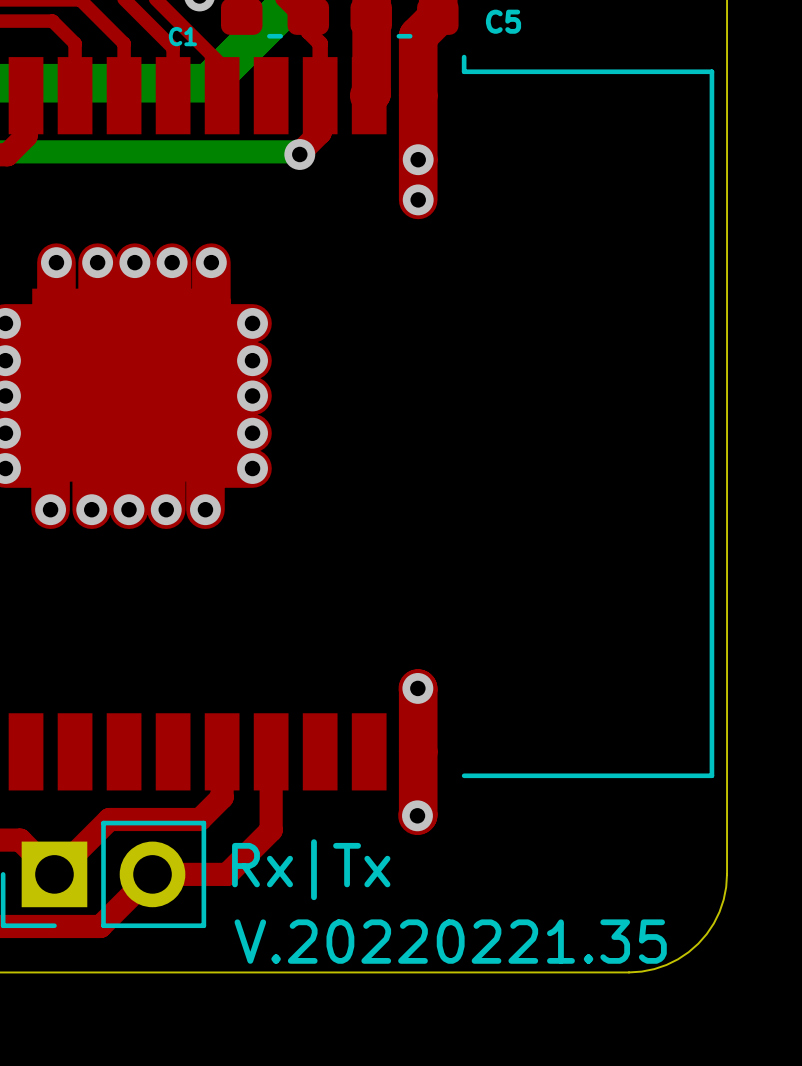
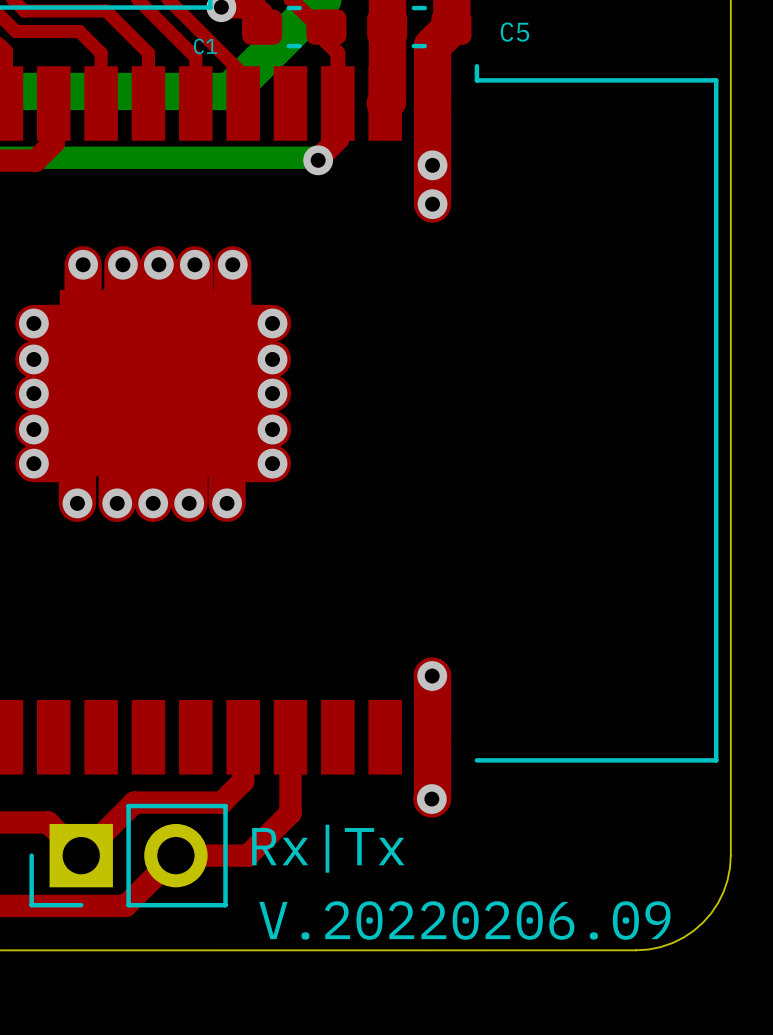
text: V.20220221.35 (450, 941) -> V.20220206.09 (464, 920)

